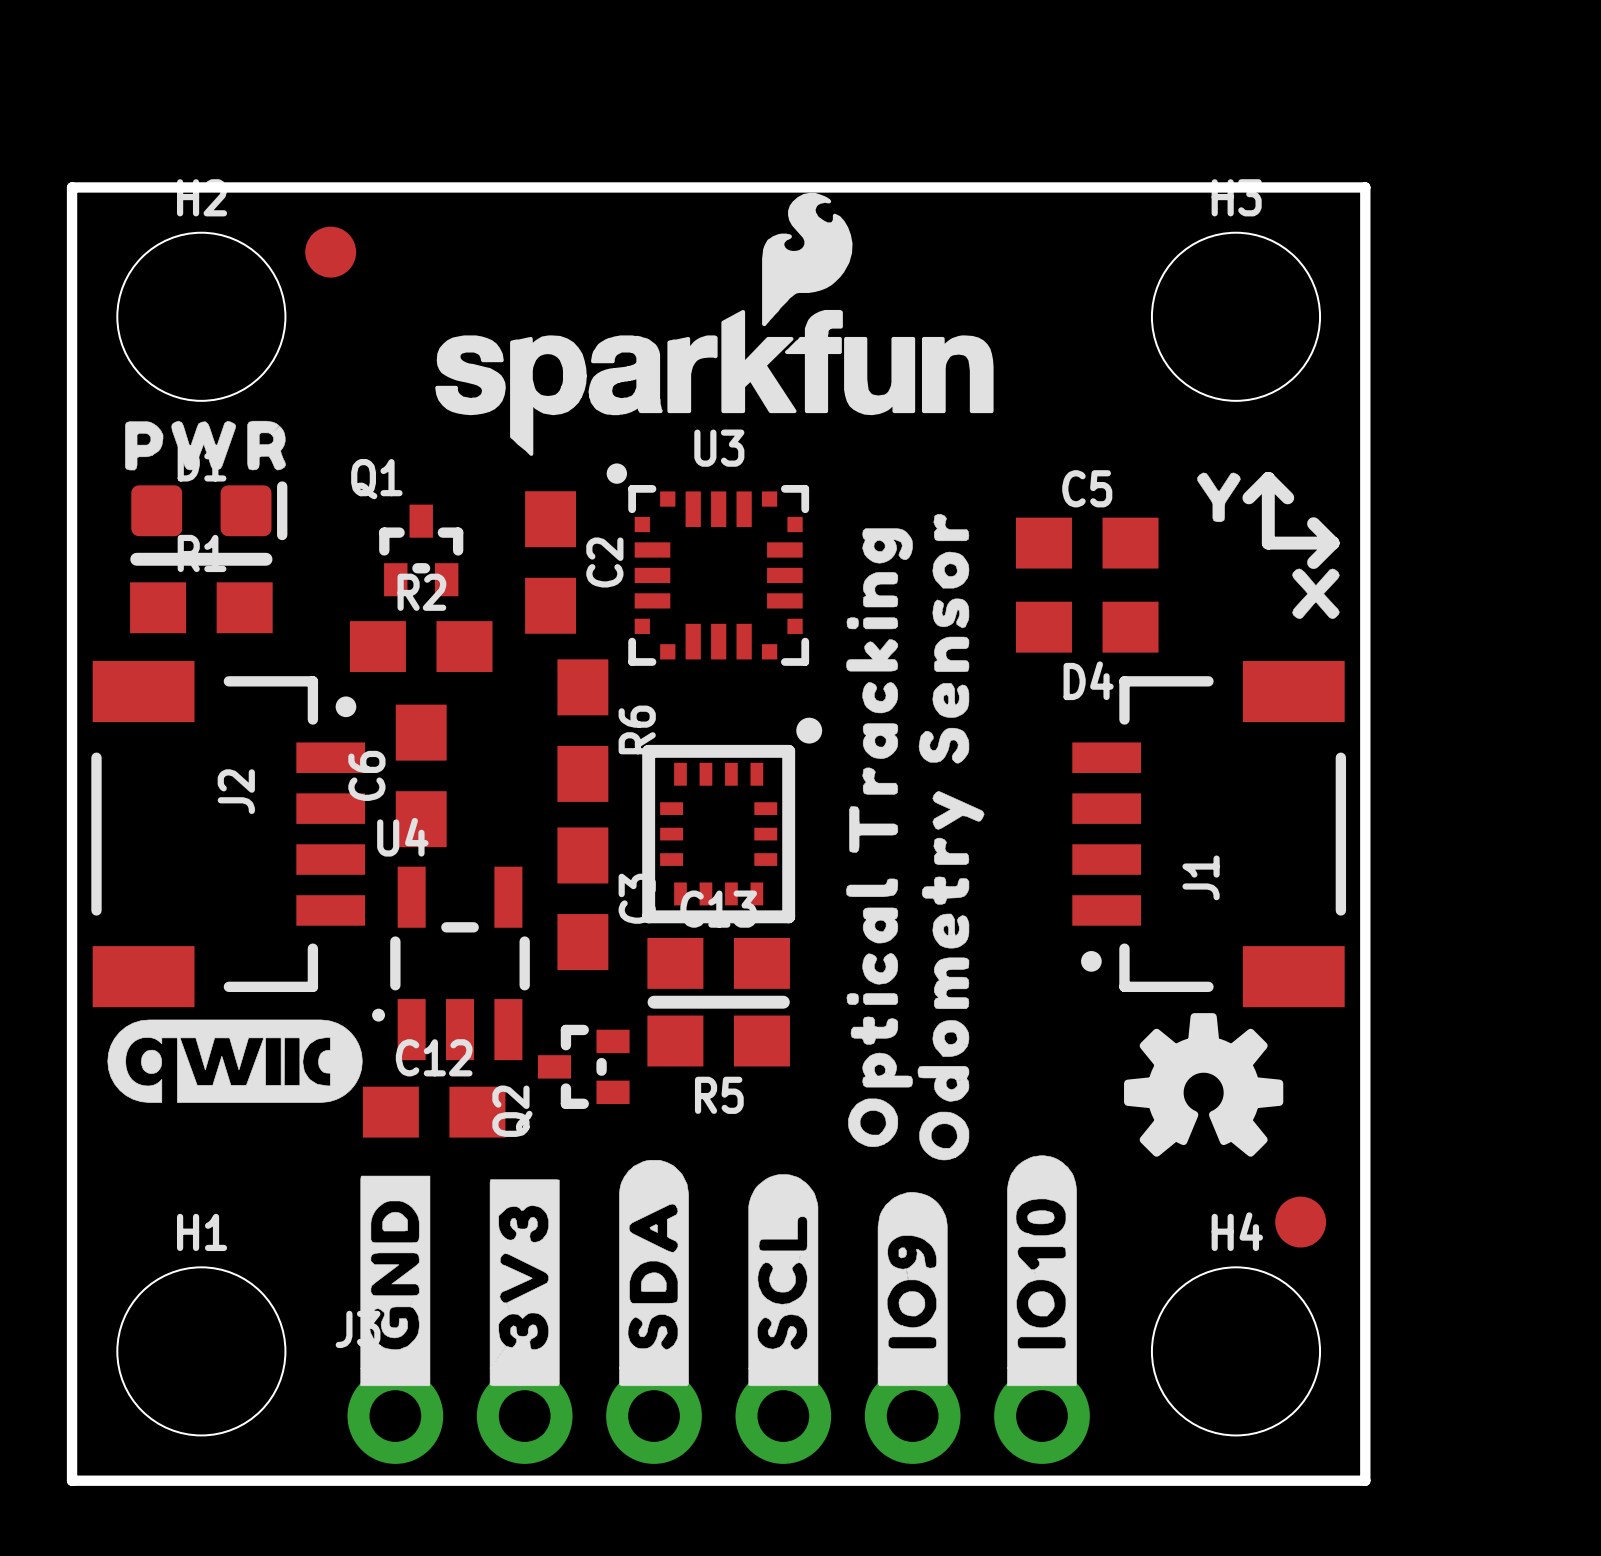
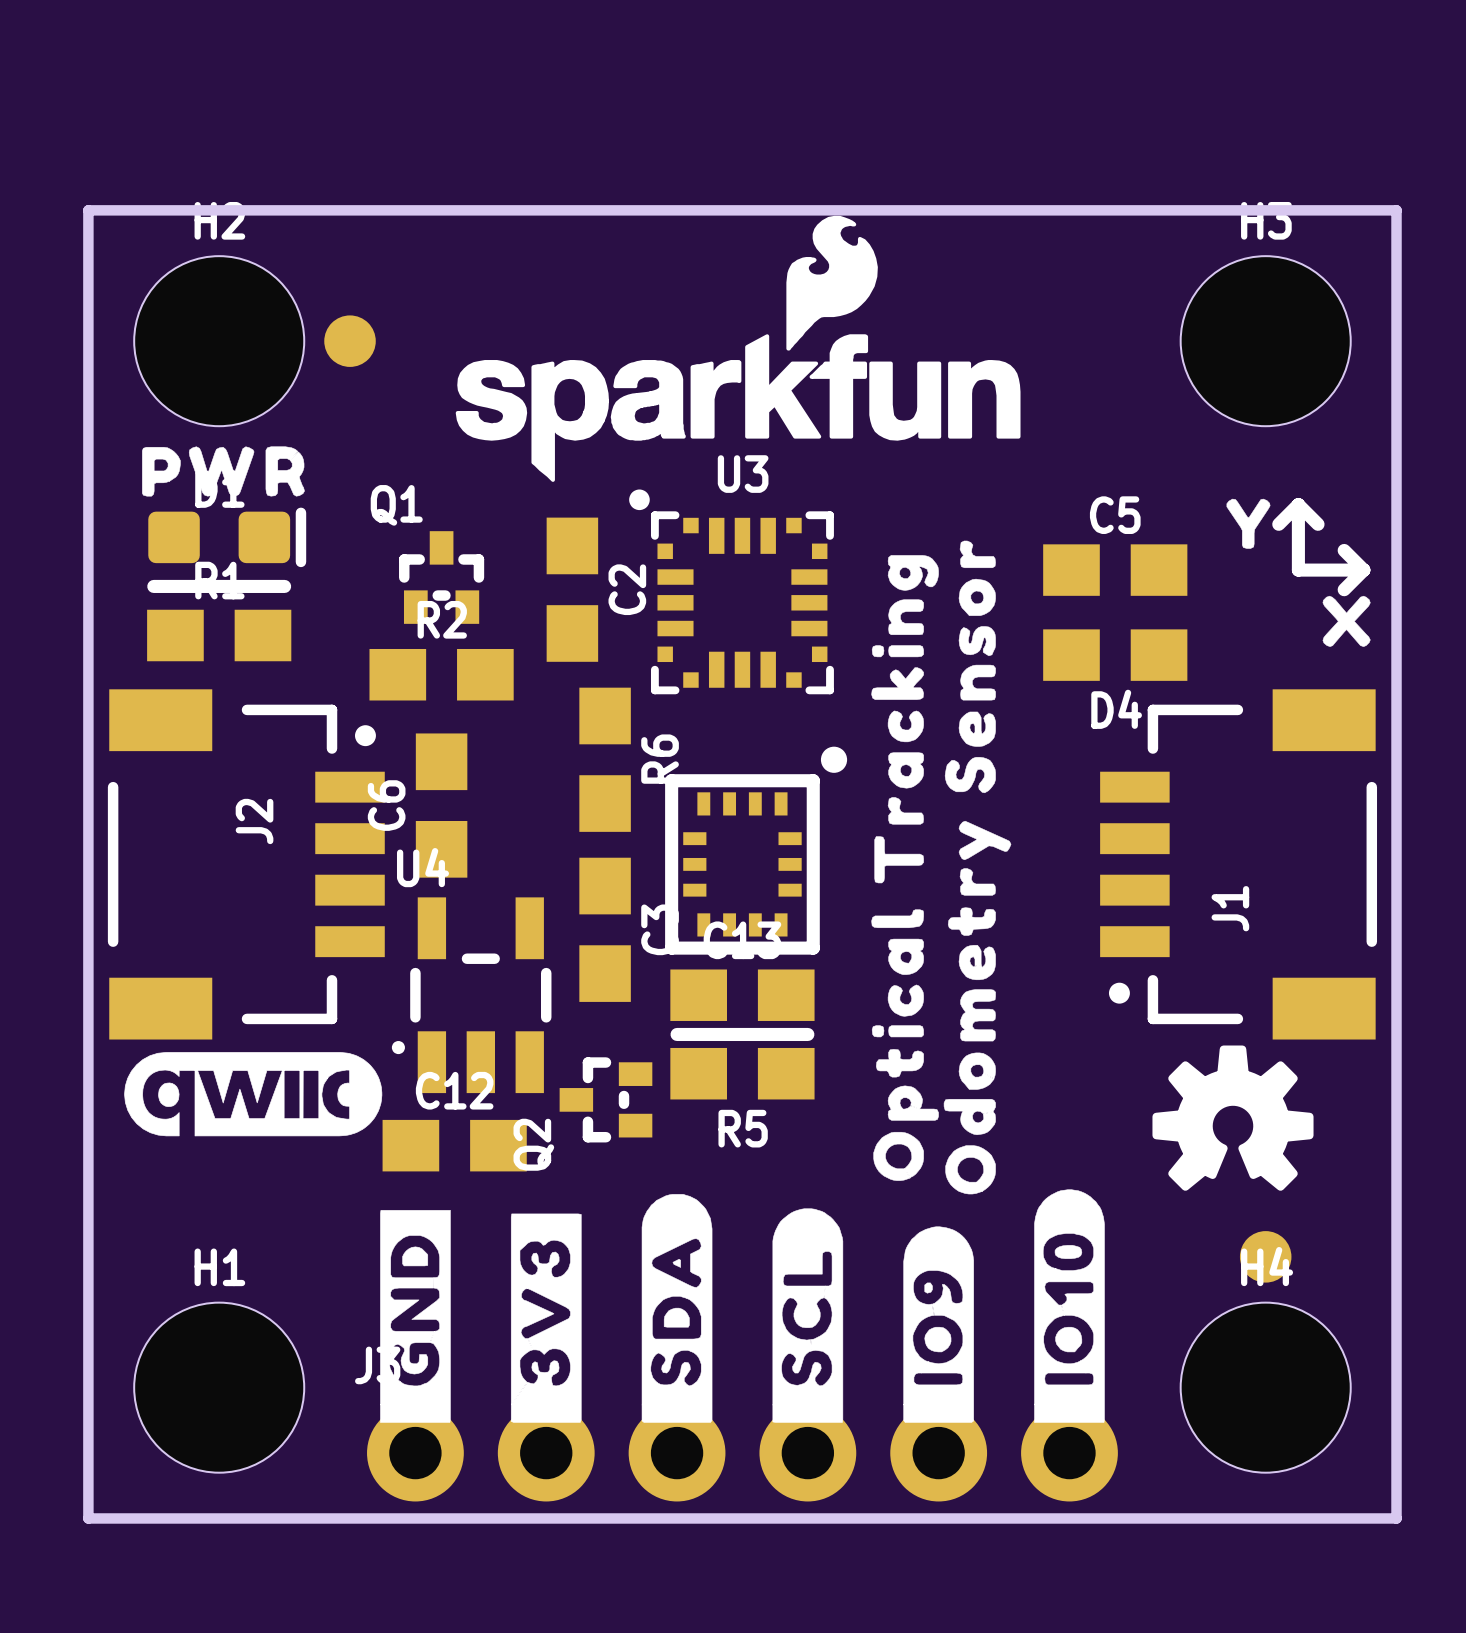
part position: (330, 252) -> (350, 341)
part position: (1300, 1222) -> (1265, 1256)

